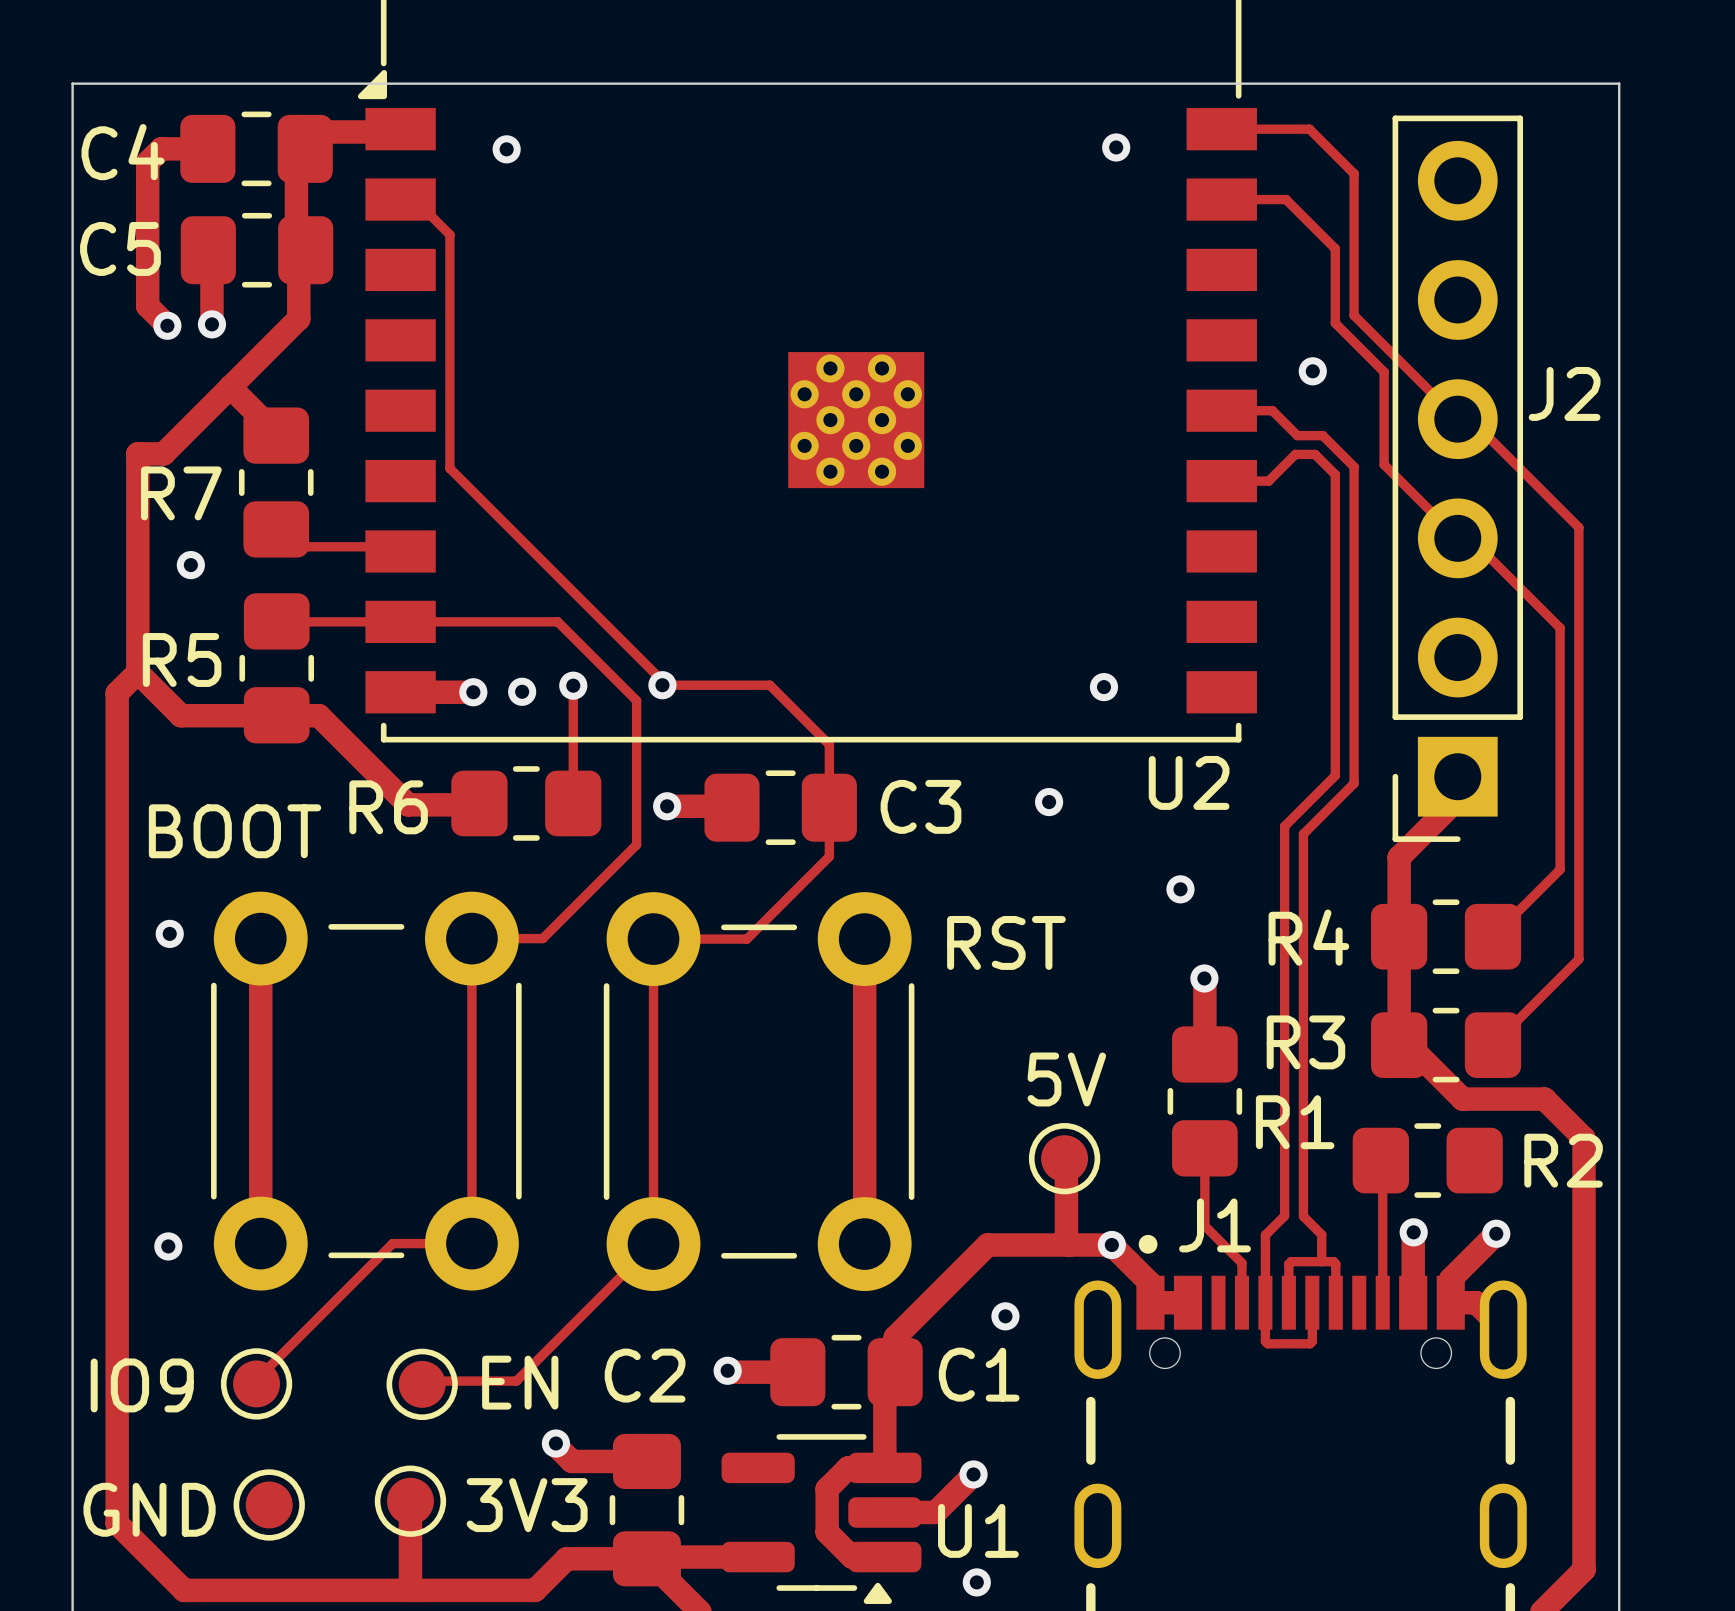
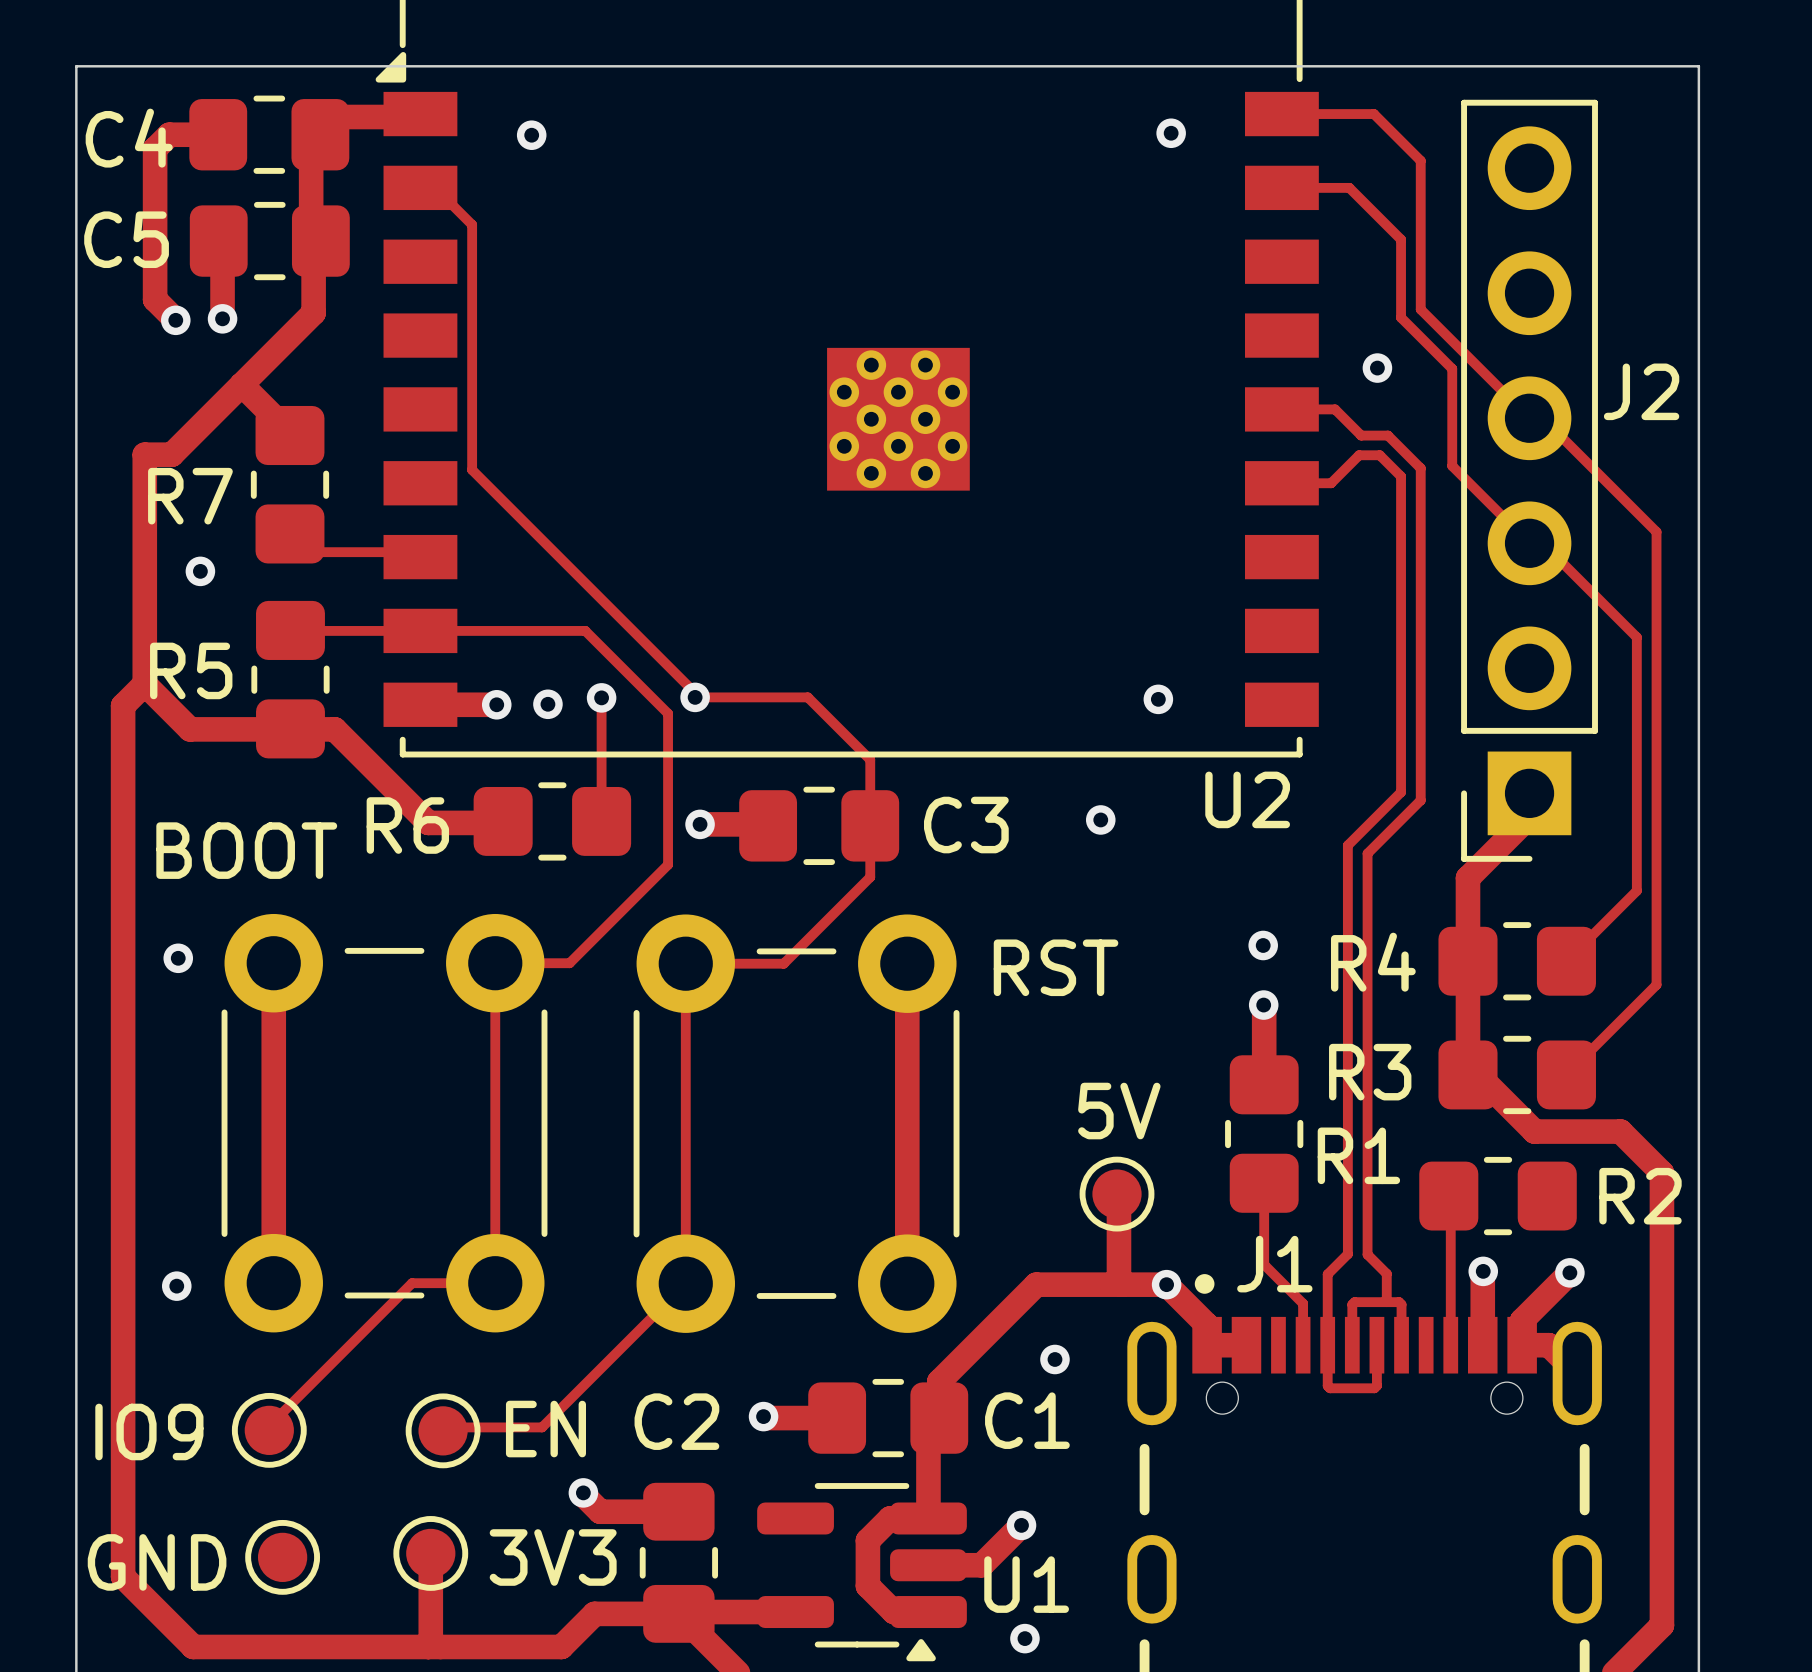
via position: (1180, 889) -> (1263, 945)

